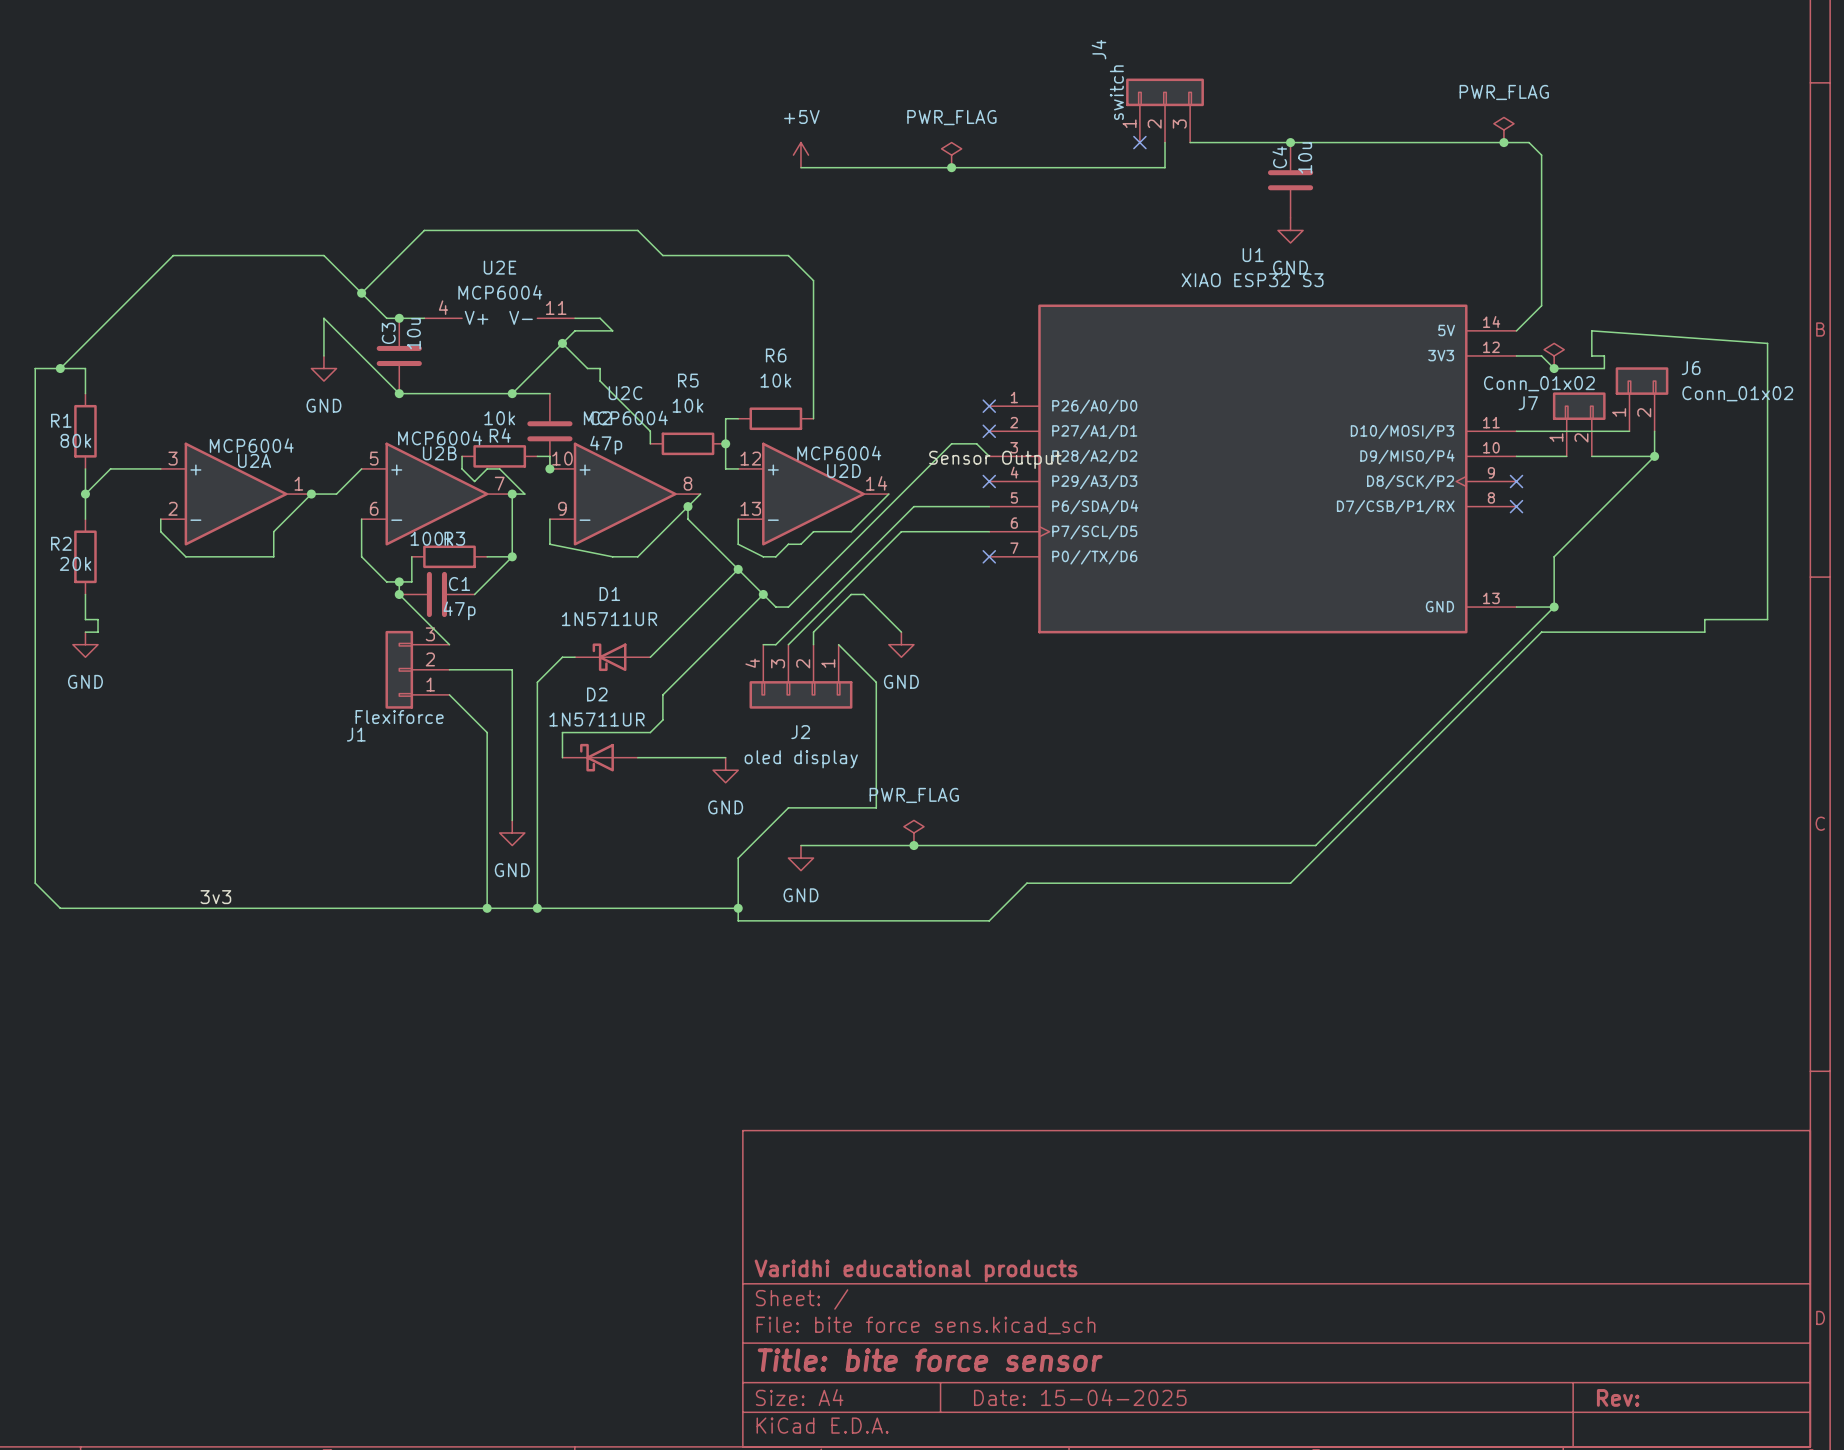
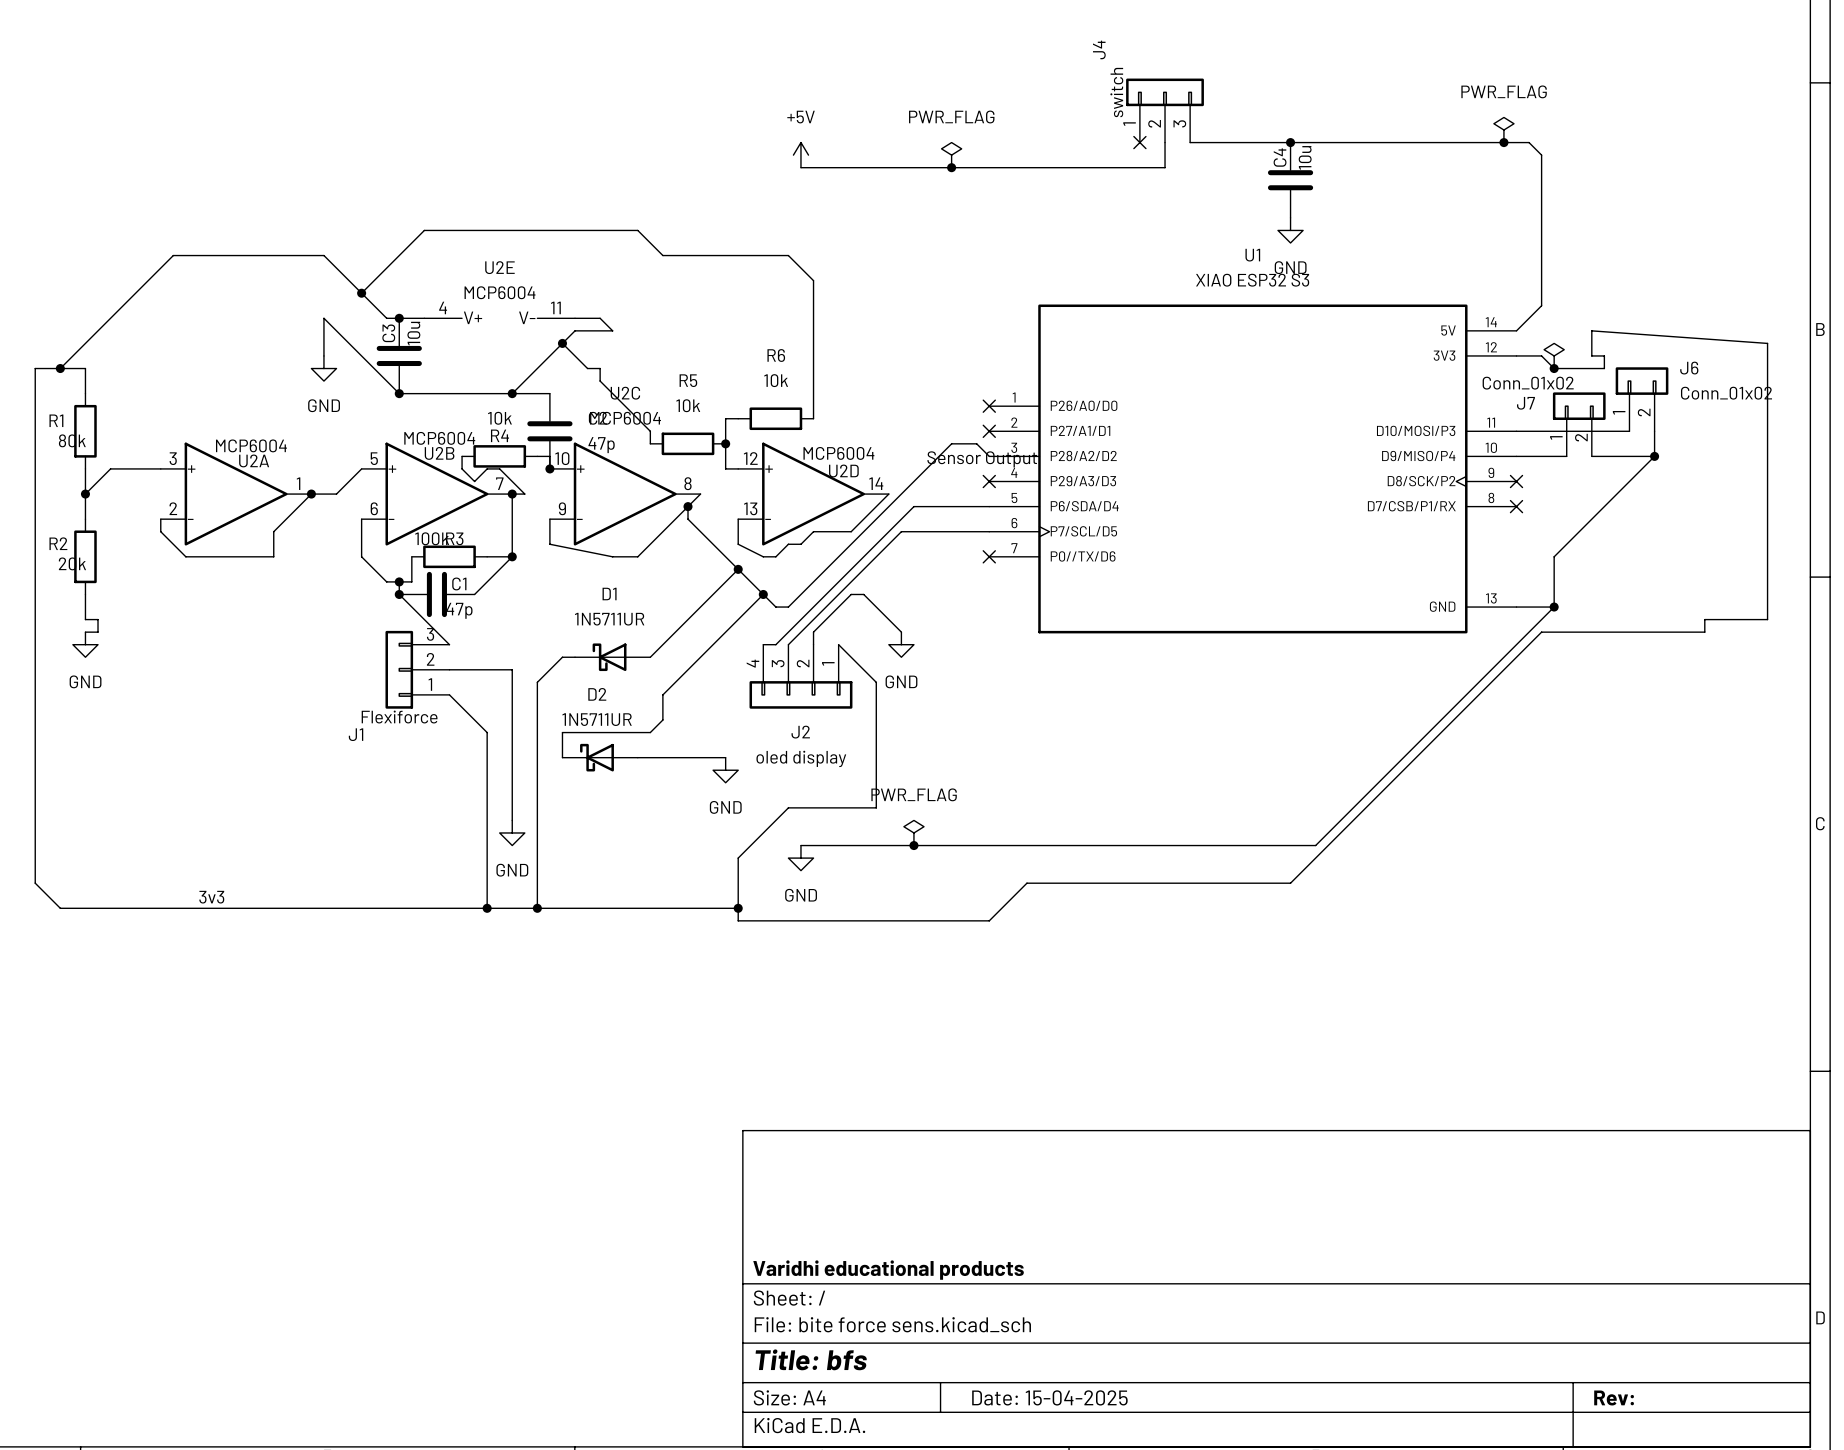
title block: Title: bite force sensor (930, 1360) -> Title: bfs (811, 1359)

